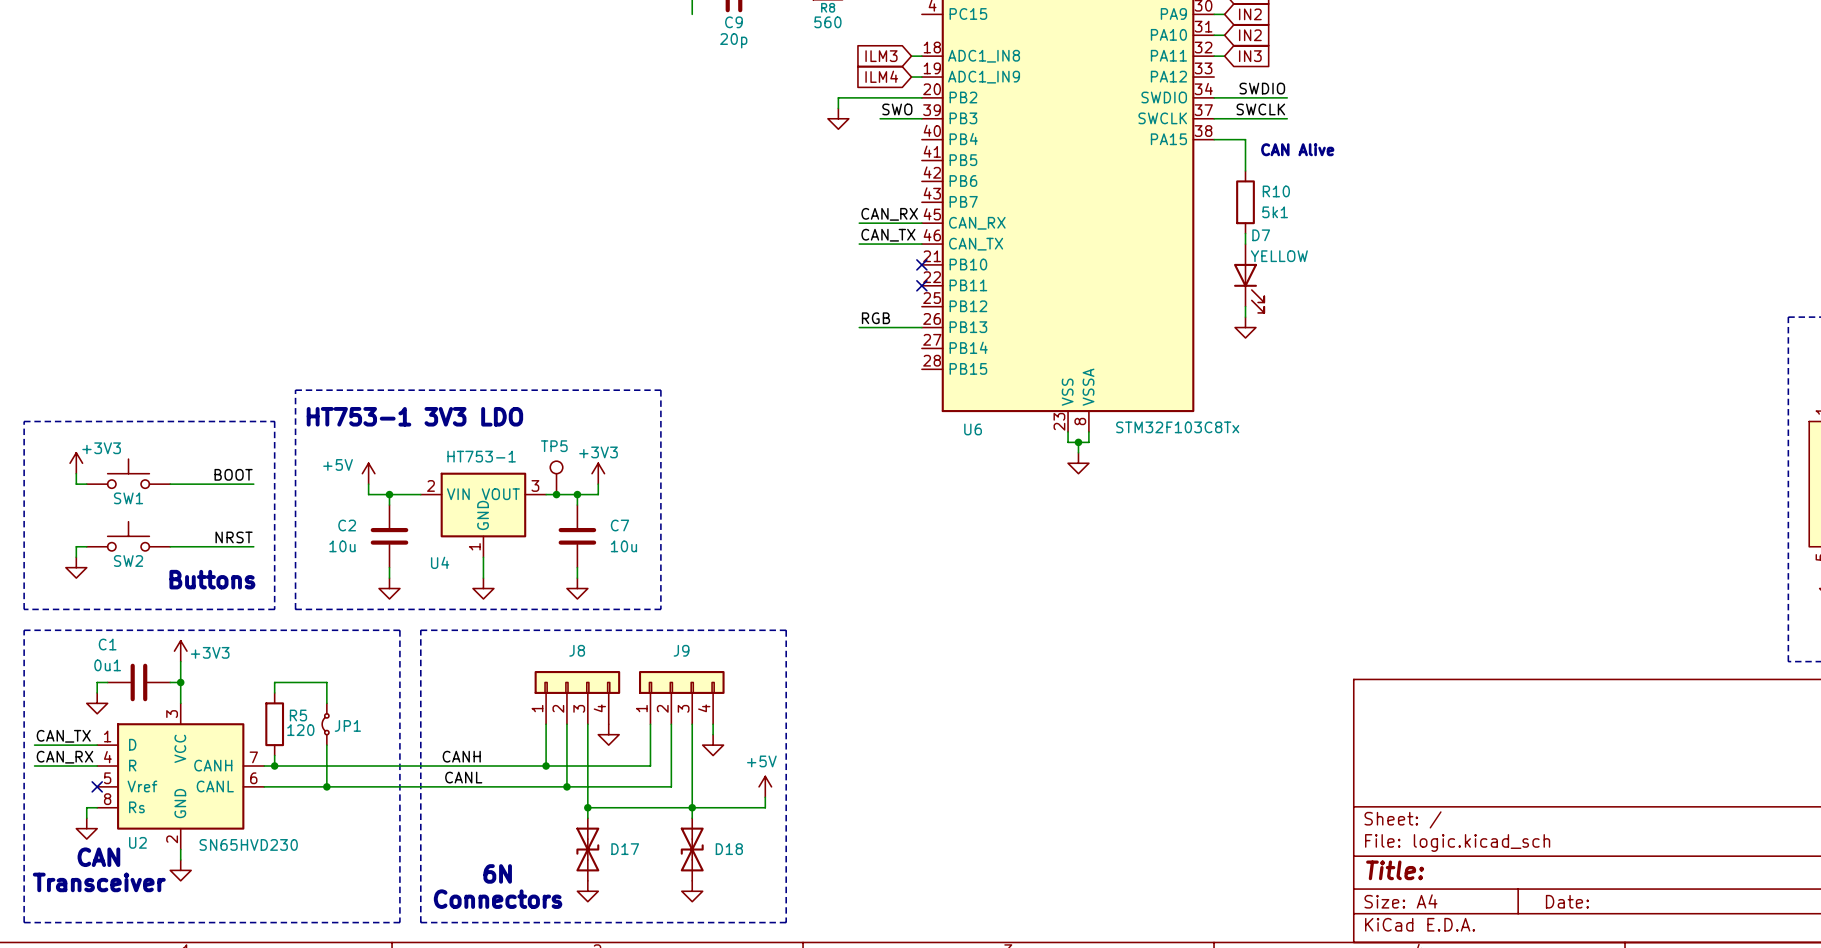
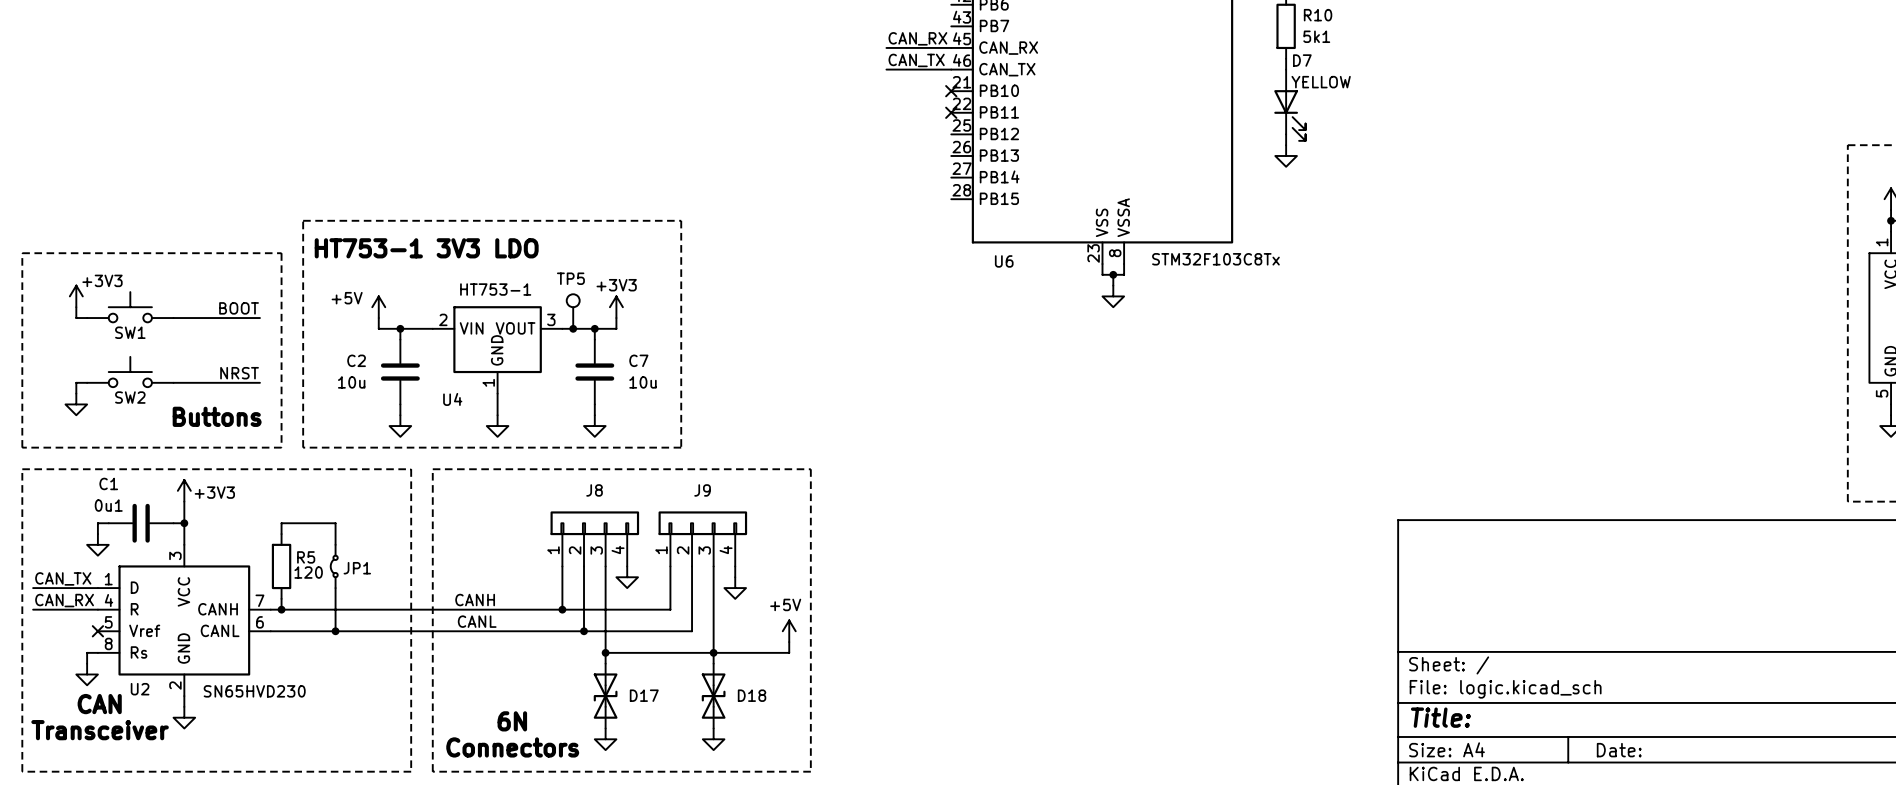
label: RGB (875, 318) -> none
wire: (859, 327) (921, 327) -> none

